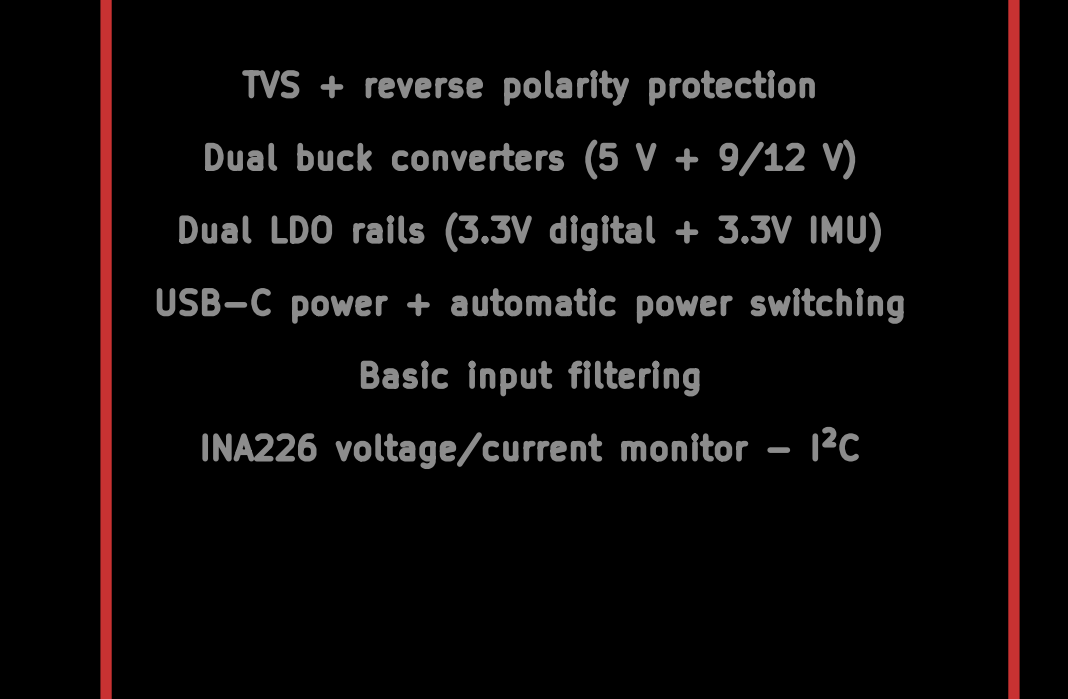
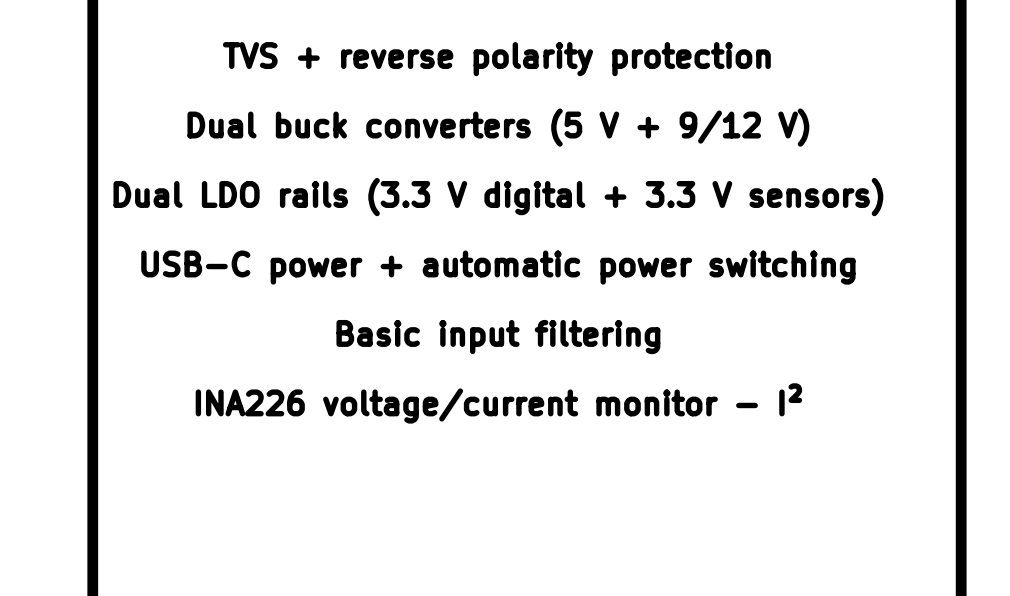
text: Dual LDO rails (3.3V digital + 3.3V IMU) (530, 232) -> Dual LDO rails (3.3 V digital + 3.3 V sensors) (498, 197)
text: INA226 voltage/current monitor - I²C (530, 447) -> INA226 voltage/current monitor - I² (498, 403)

